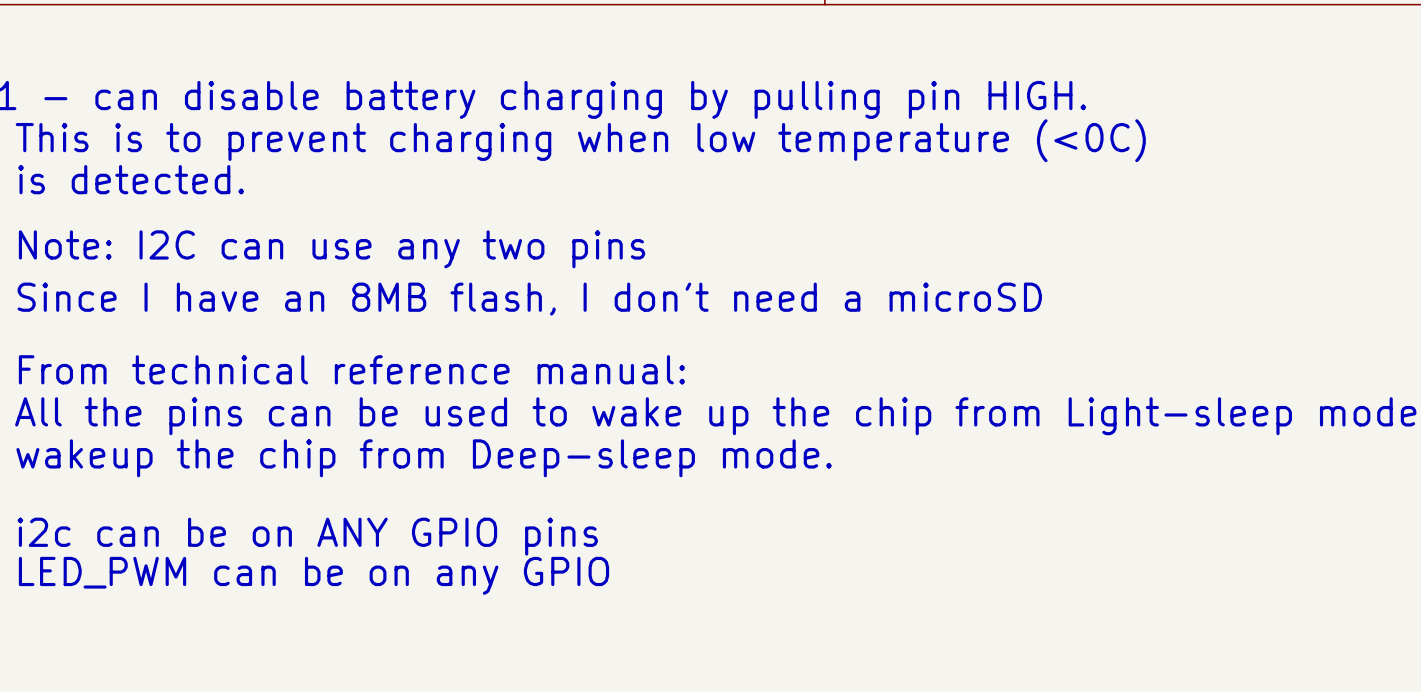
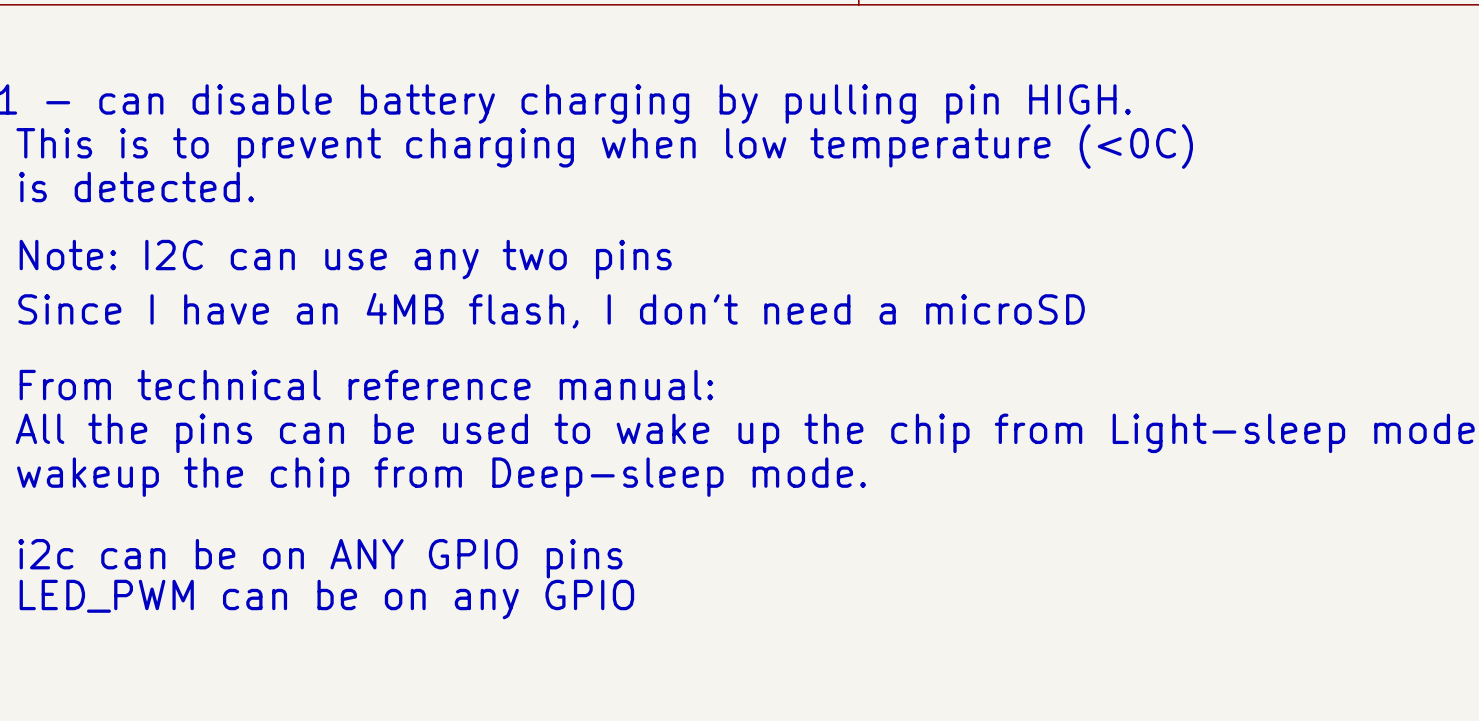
text: Since I have an 8MB flash, I don't need a microSD (529, 299) -> Since I have an 4MB flash, I don't need a microSD (551, 310)

